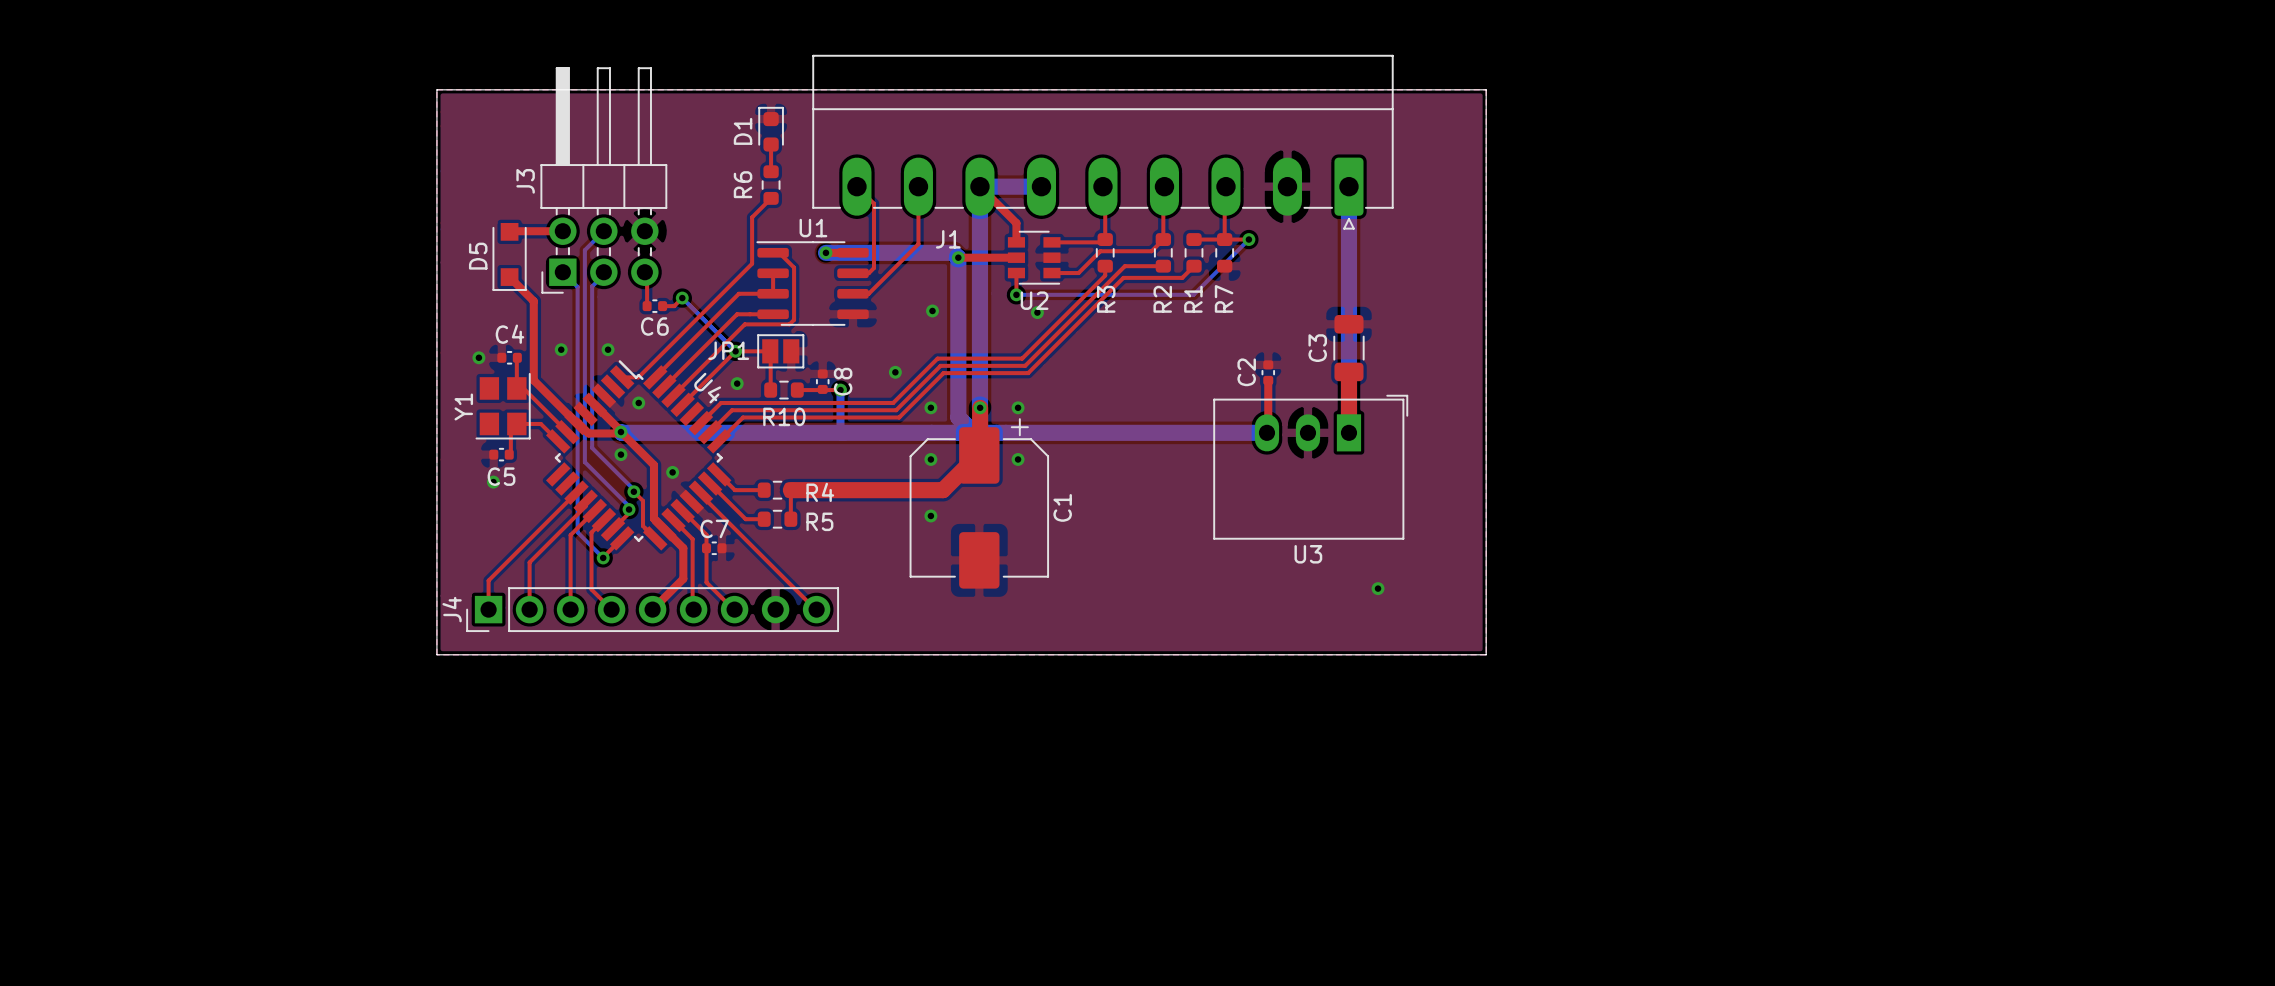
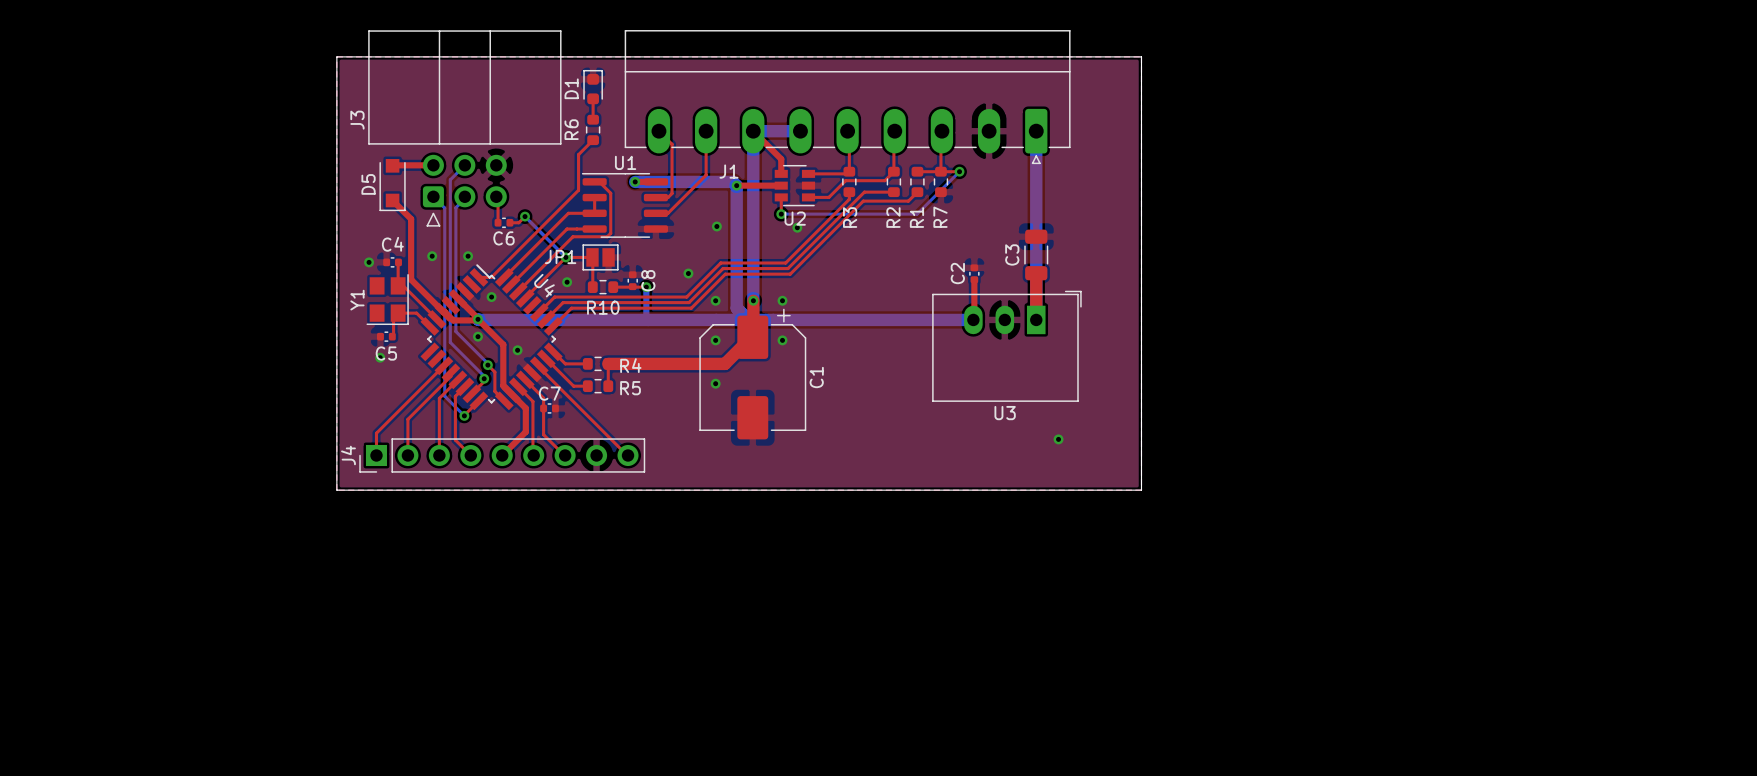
J3 footprint: [540, 67, 668, 294] -> [368, 30, 562, 227]
J3 name position: J3 (525, 181) -> J3 (357, 120)

